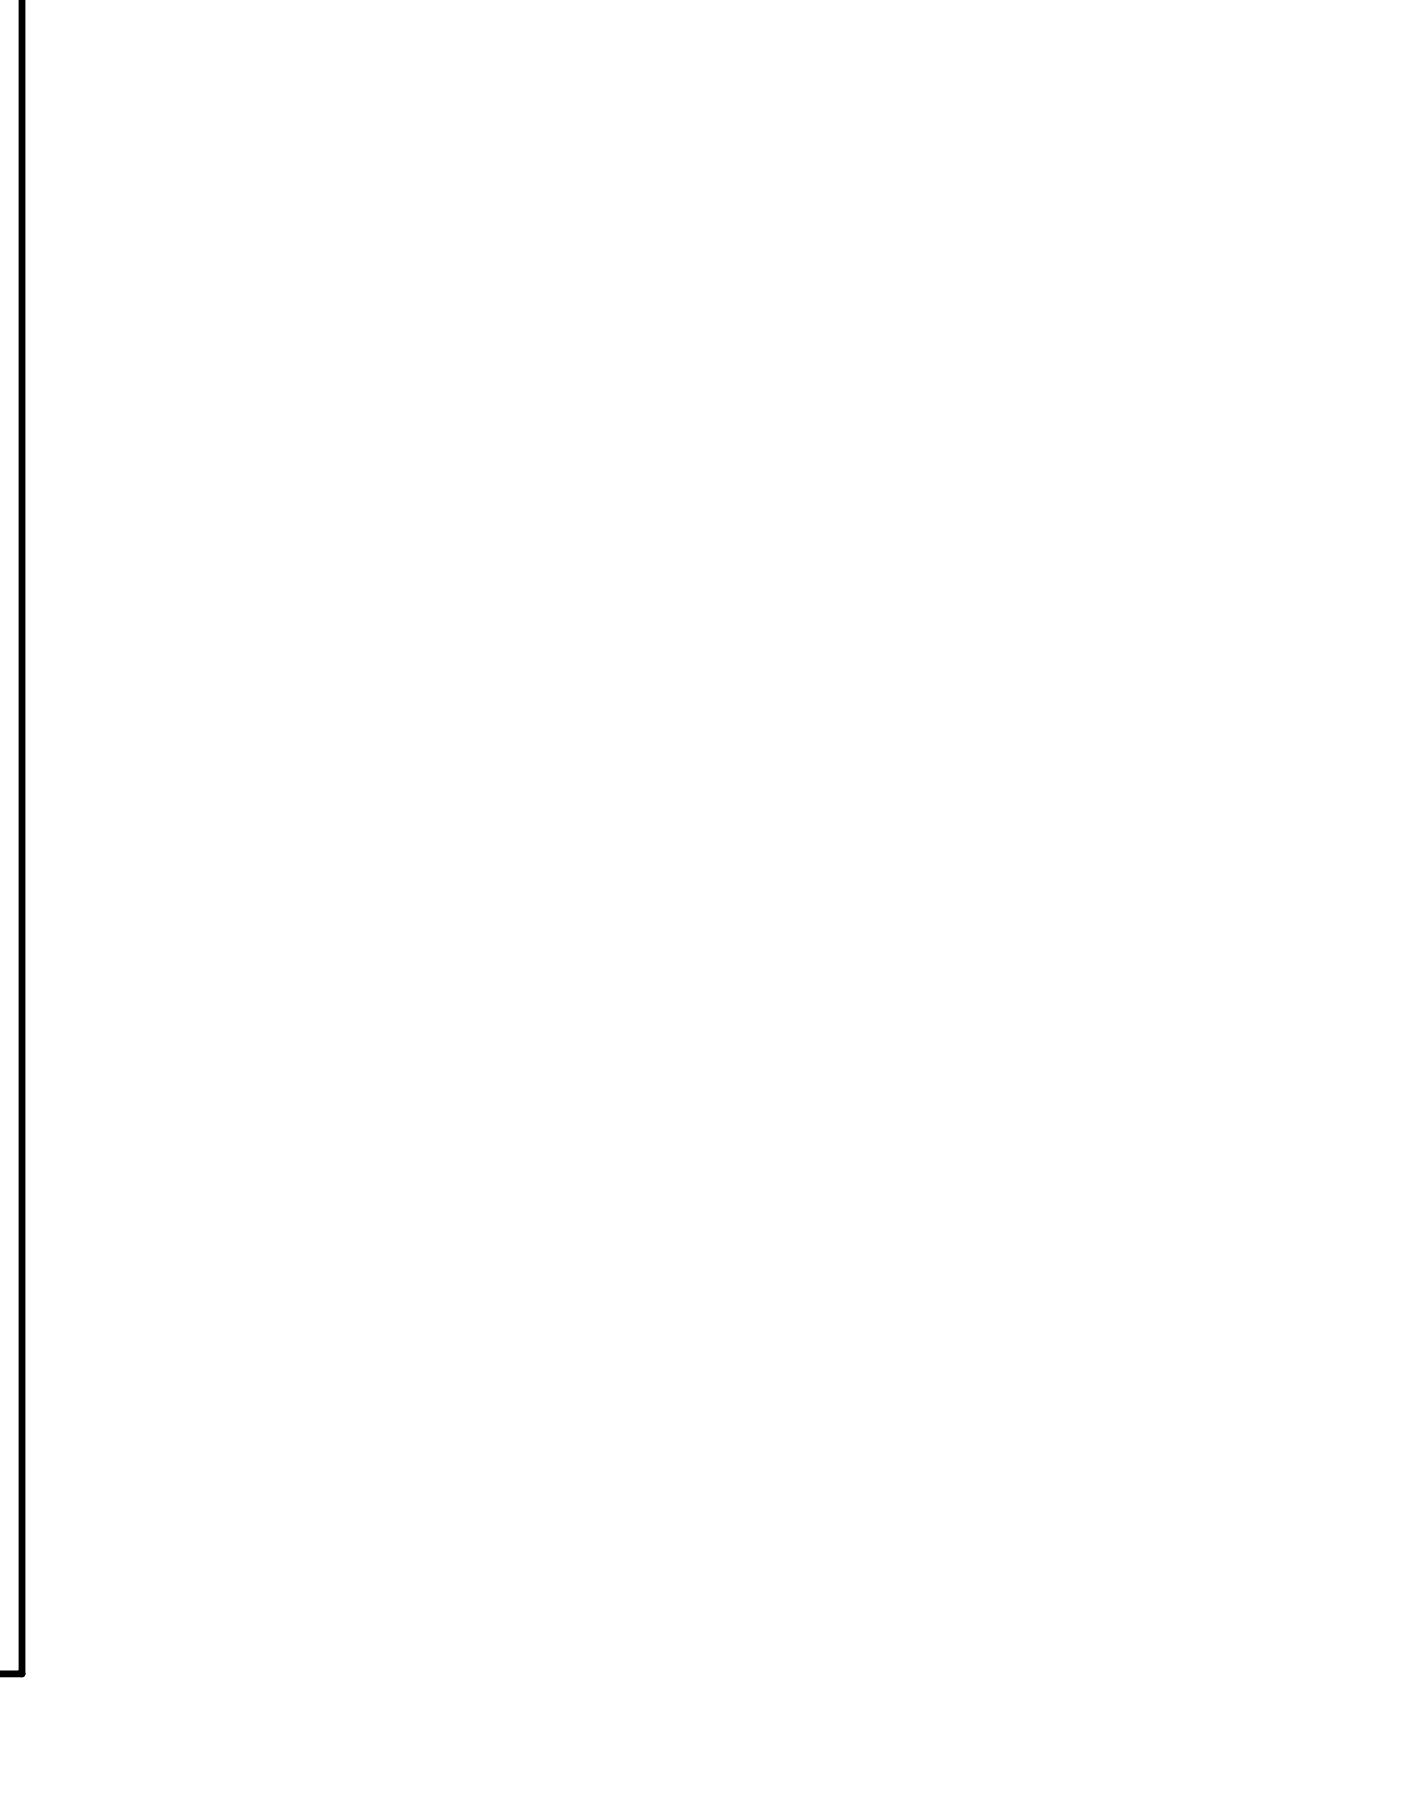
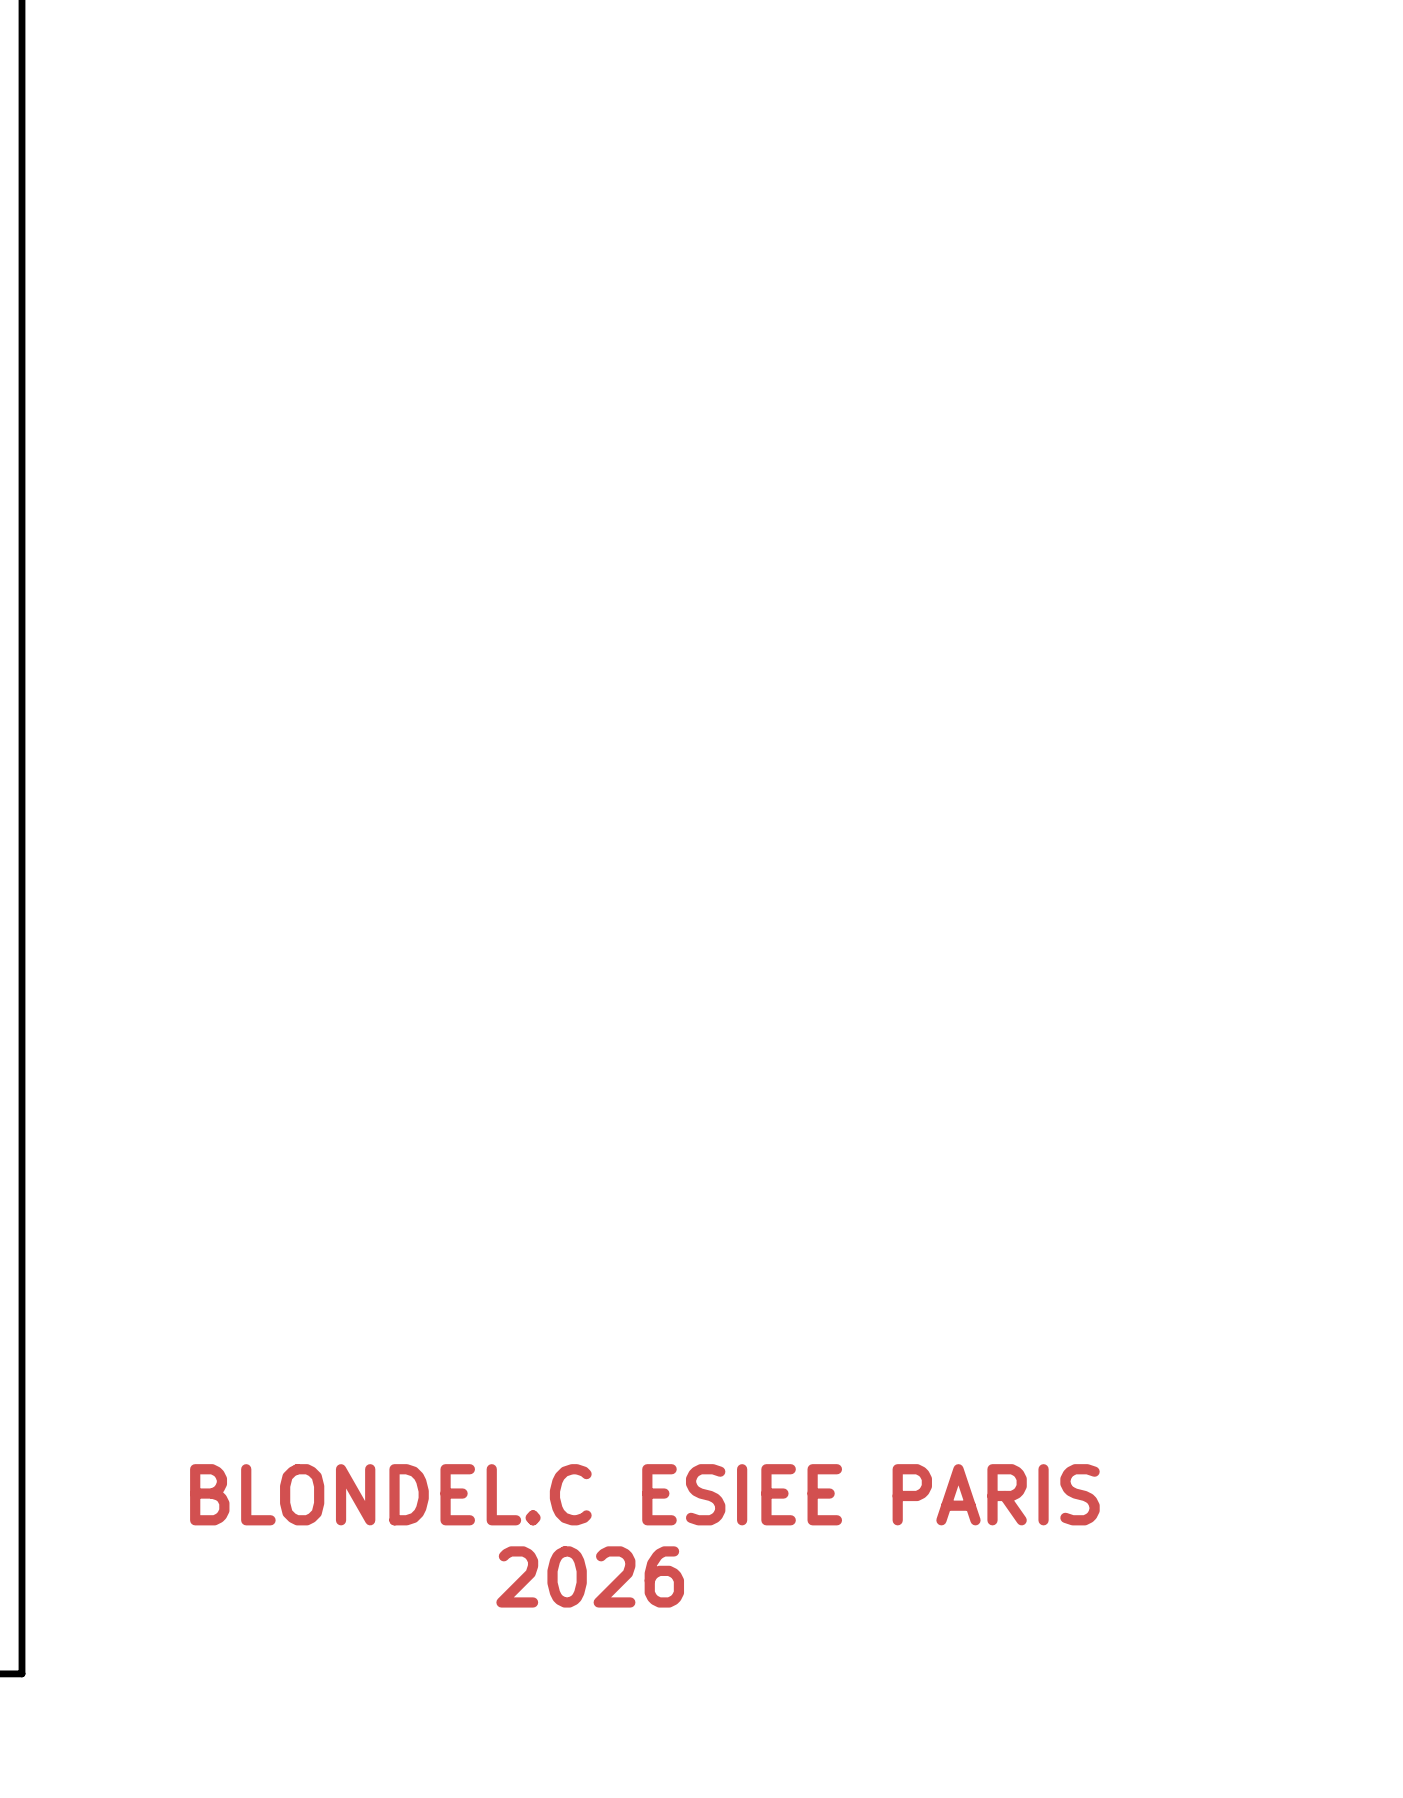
text: none -> BLONDEL.C ESIEE PARIS (644, 1494)
text: none -> 2026 (590, 1576)

